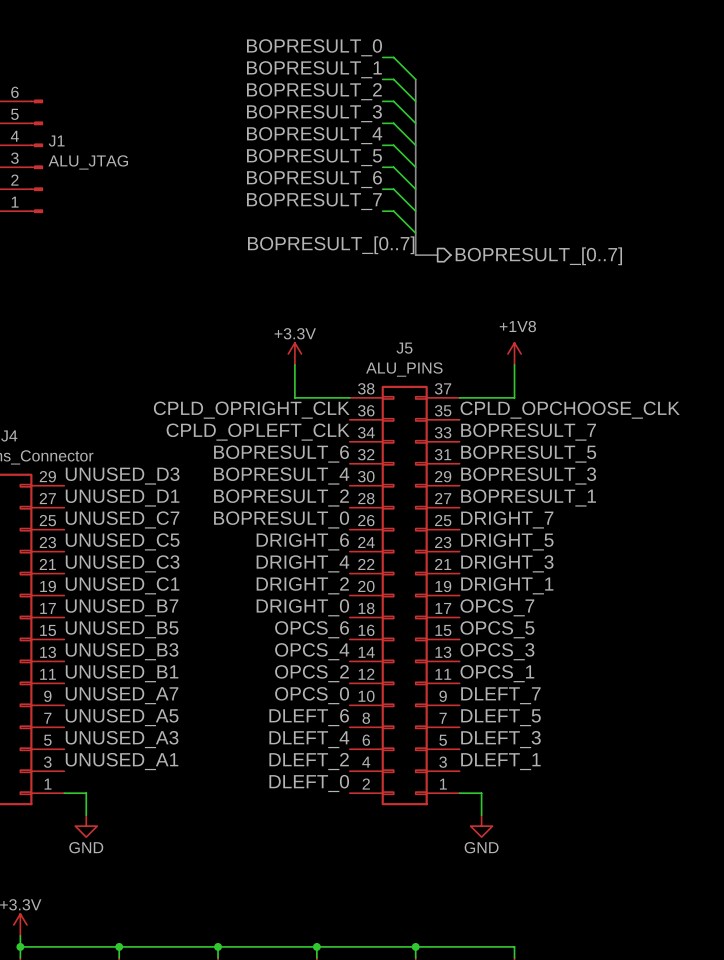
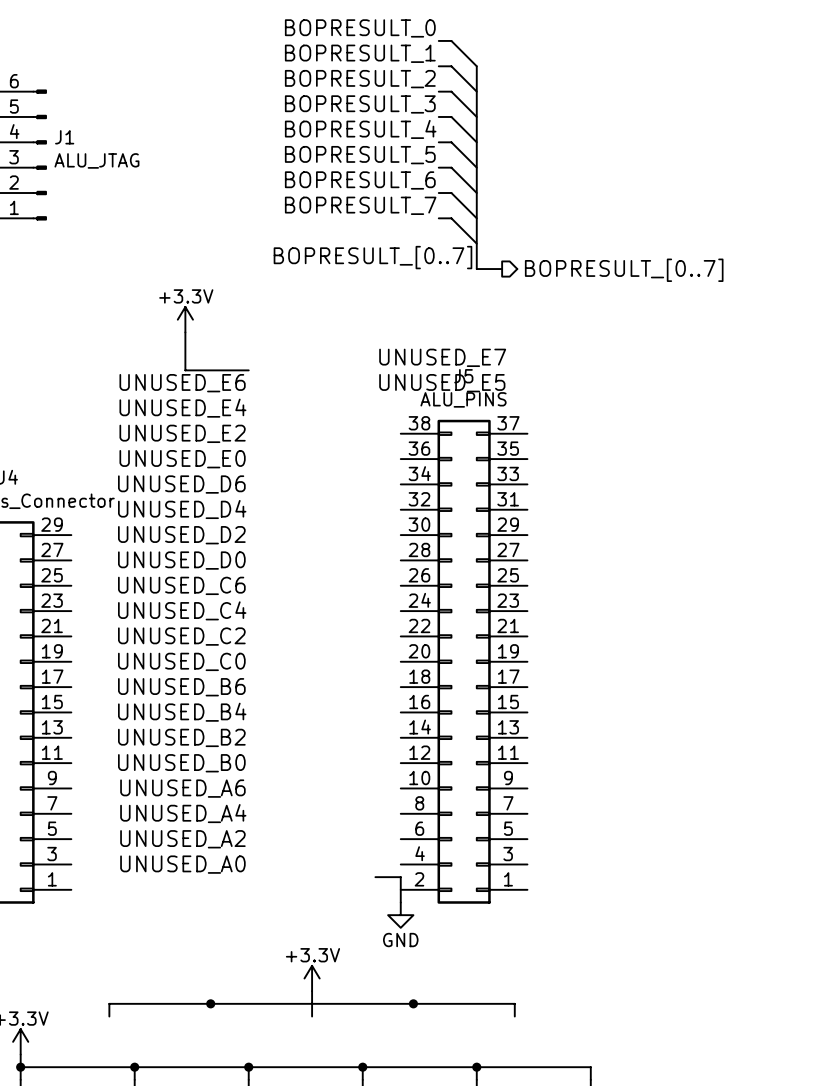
label: none -> UNUSED_E7 (442, 357)
power symbol position: +3.3V (294, 353) -> +3.3V (185, 319)
power symbol: +1V8 (514, 353) -> none
label: none -> UNUSED_E6 (182, 383)
label: none -> UNUSED_E5 (442, 383)
wire: (294, 364) (294, 397) (349, 397) -> (185, 332) (185, 370) (248, 370)
wire: (514, 364) (514, 397) (459, 397) -> none
label: none -> UNUSED_E4 (182, 408)
label: none -> UNUSED_E2 (182, 433)
label: CPLD_OPRIGHT_CLK (251, 410) -> none
label: CPLD_OPCHOOSE_CLK (570, 410) -> none
label: none -> UNUSED_E0 (182, 459)
label: CPLD_OPLEFT_CLK (258, 432) -> none
label: BOPRESULT_7 (528, 432) -> none
label: none -> UNUSED_D6 (181, 484)
label: BOPRESULT_6 (281, 454) -> none
label: BOPRESULT_5 (528, 454) -> none
label: none -> UNUSED_D4 (182, 509)
label: UNUSED_D3 (122, 476) -> none
label: BOPRESULT_4 (281, 476) -> none
label: BOPRESULT_3 (528, 476) -> none
label: none -> UNUSED_D2 (181, 535)
label: UNUSED_D1 (122, 497) -> none
label: BOPRESULT_2 (281, 497) -> none
label: BOPRESULT_1 (528, 497) -> none
label: none -> UNUSED_D0 (181, 560)
label: UNUSED_C7 (122, 519) -> none
label: BOPRESULT_0 (281, 519) -> none
label: DRIGHT_7 (507, 519) -> none
label: none -> UNUSED_C6 (181, 585)
label: UNUSED_C5 (122, 541) -> none
label: DRIGHT_6 (302, 541) -> none
label: DRIGHT_5 (507, 541) -> none
label: none -> UNUSED_C4 (182, 610)
label: UNUSED_C3 (122, 563) -> none
label: DRIGHT_4 (302, 563) -> none
label: DRIGHT_3 (507, 563) -> none
label: none -> UNUSED_C2 (181, 636)
label: UNUSED_C1 (122, 585) -> none
label: DRIGHT_2 (302, 585) -> none
label: DRIGHT_1 (507, 585) -> none
label: none -> UNUSED_C0 (181, 661)
label: UNUSED_B7 (122, 607) -> none
label: DRIGHT_0 (302, 607) -> none
label: OPCS_7 (497, 607) -> none
label: none -> UNUSED_B6 (181, 687)
label: UNUSED_B5 (122, 629) -> none
label: OPCS_6 (312, 629) -> none
label: OPCS_5 (497, 629) -> none
label: none -> UNUSED_B4 (182, 712)
label: UNUSED_B3 (122, 651) -> none
label: OPCS_4 (312, 651) -> none
label: OPCS_3 (497, 651) -> none
label: none -> UNUSED_B2 (181, 737)
label: UNUSED_B1 (122, 673) -> none
label: OPCS_2 (311, 673) -> none
label: OPCS_1 (497, 673) -> none
label: none -> UNUSED_B0 (181, 763)
label: UNUSED_A7 (122, 695) -> none
label: OPCS_0 (312, 695) -> none
label: DLEFT_7 (500, 695) -> none
label: none -> UNUSED_A6 (182, 788)
label: UNUSED_A5 (122, 717) -> none
label: DLEFT_6 (309, 717) -> none
label: DLEFT_5 (500, 717) -> none
label: none -> UNUSED_A4 (183, 813)
label: UNUSED_A3 (122, 739) -> none
label: DLEFT_4 (309, 739) -> none
label: DLEFT_3 (500, 739) -> none
label: none -> UNUSED_A2 (182, 839)
label: UNUSED_A1 (122, 761) -> none
label: DLEFT_2 (309, 761) -> none
label: DLEFT_1 (500, 761) -> none
label: none -> UNUSED_A0 (182, 864)
label: DLEFT_0 (309, 783) -> none
wire: (64, 793) (86, 793) (86, 815) -> none
wire: (459, 793) (481, 793) (481, 815) -> (375, 877) (400, 877) (400, 902)
power symbol: none -> GND (400, 915)
power symbol: GND (86, 826) -> none
power symbol: GND (481, 826) -> none
power symbol: none -> +3.3V (312, 978)
wire: none -> (312, 991) (312, 1016)
junction: none -> (210, 1003)
junction: none -> (413, 1003)
wire: none -> (109, 1016) (109, 1003) (514, 1003) (514, 1016)

